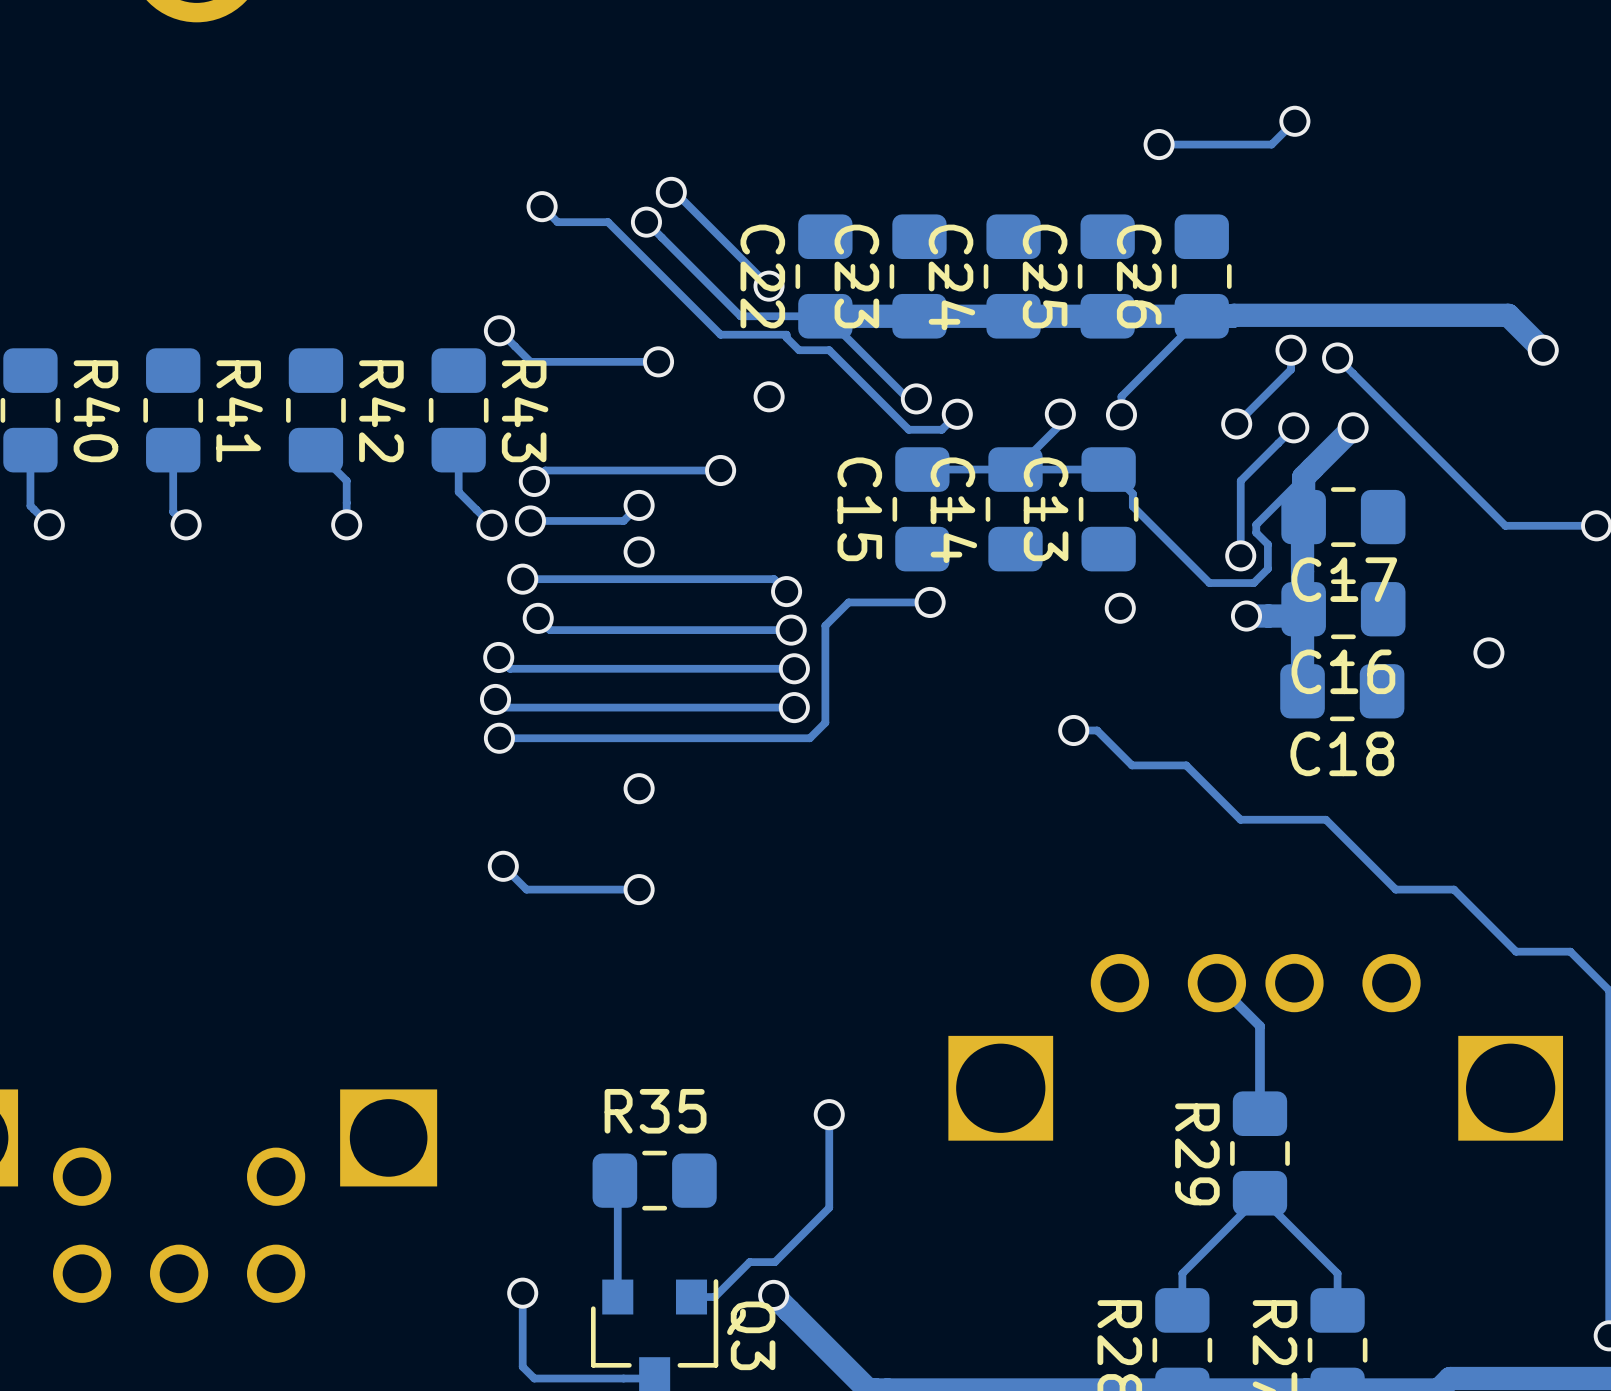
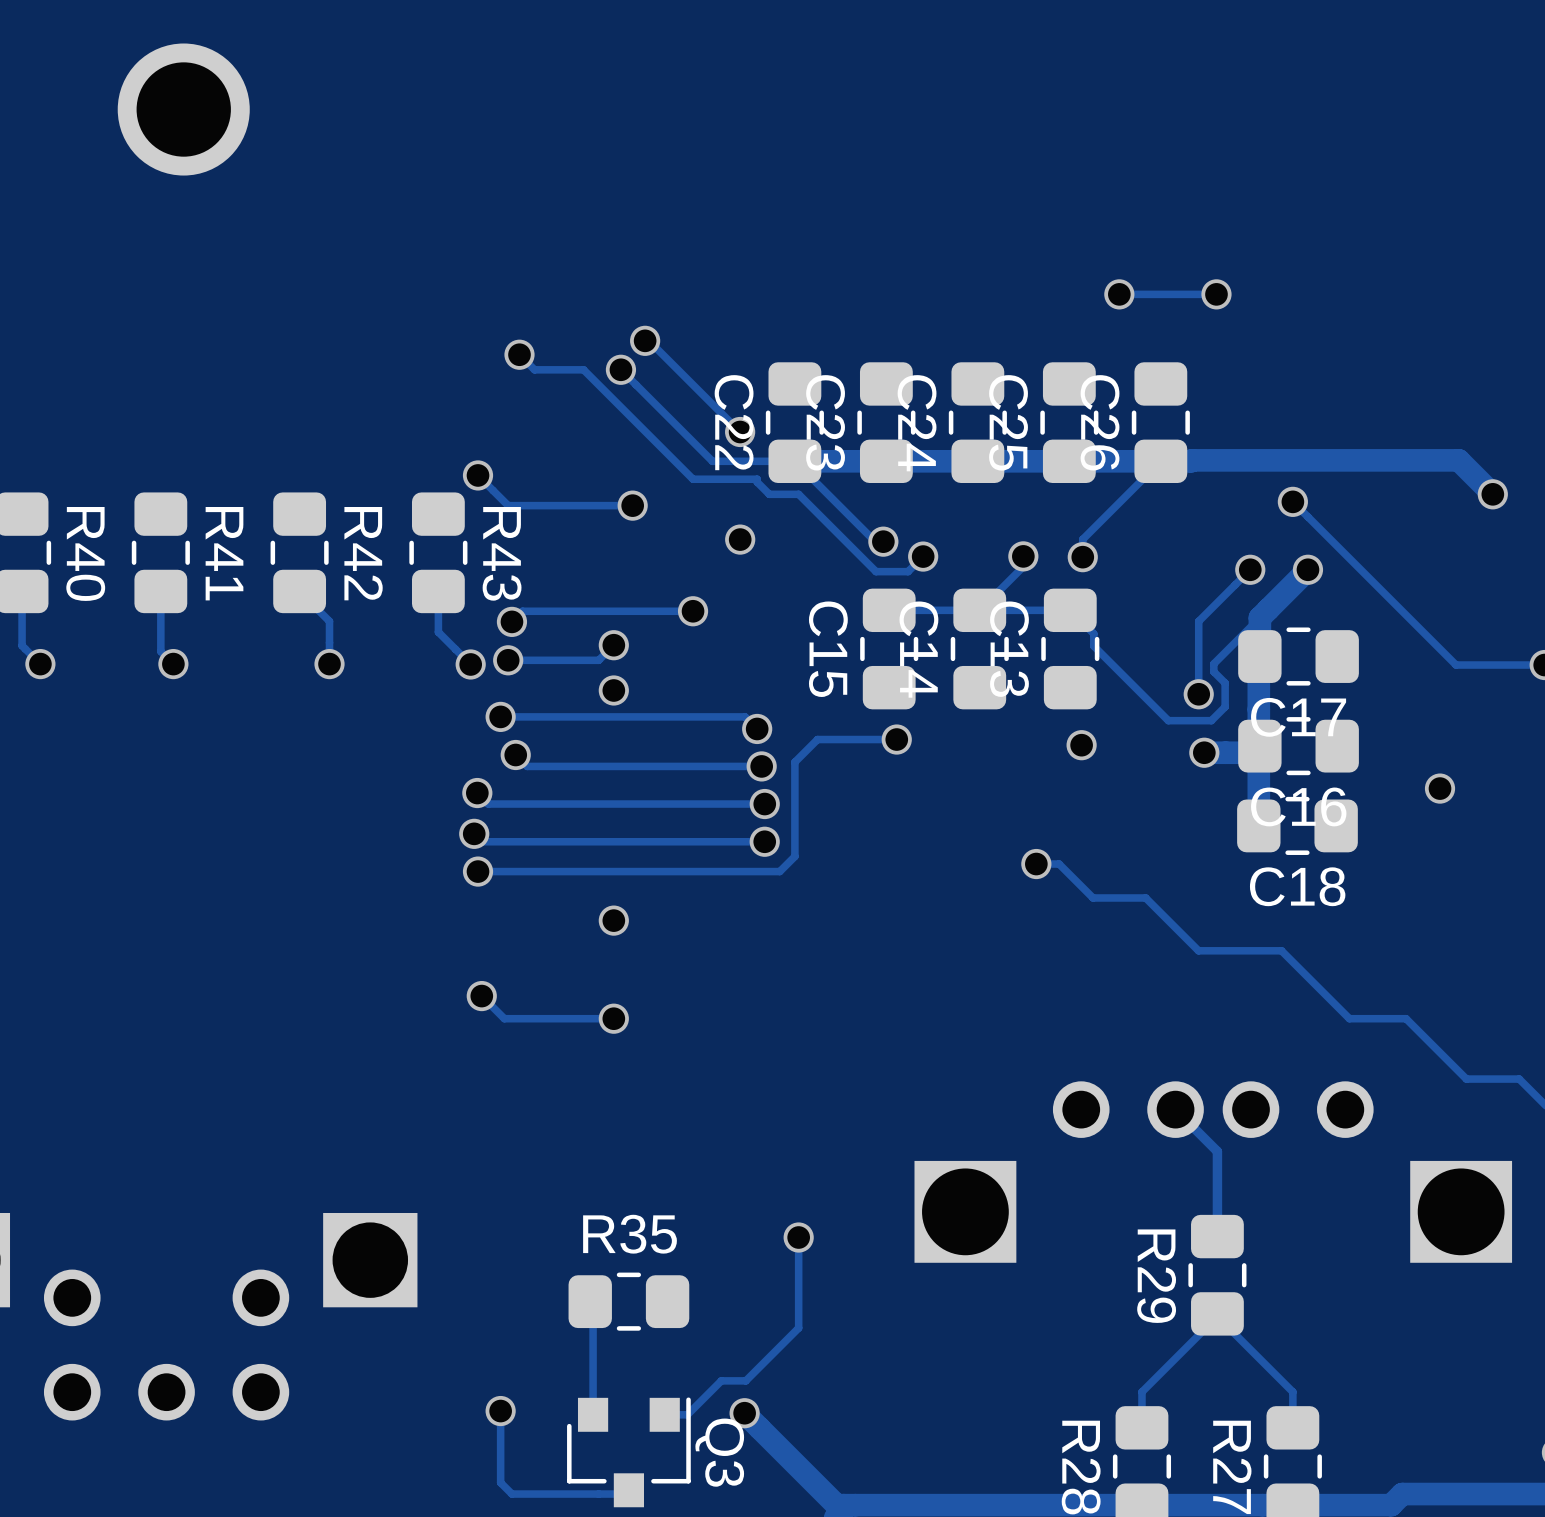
track: (1294, 121) (1271, 144) (1259, 144) -> none
via position: (1294, 121) -> (1216, 294)
track: (1291, 350) (1291, 369) (1236, 423) -> none
via: (1291, 350) -> none
via: (1236, 423) -> none

